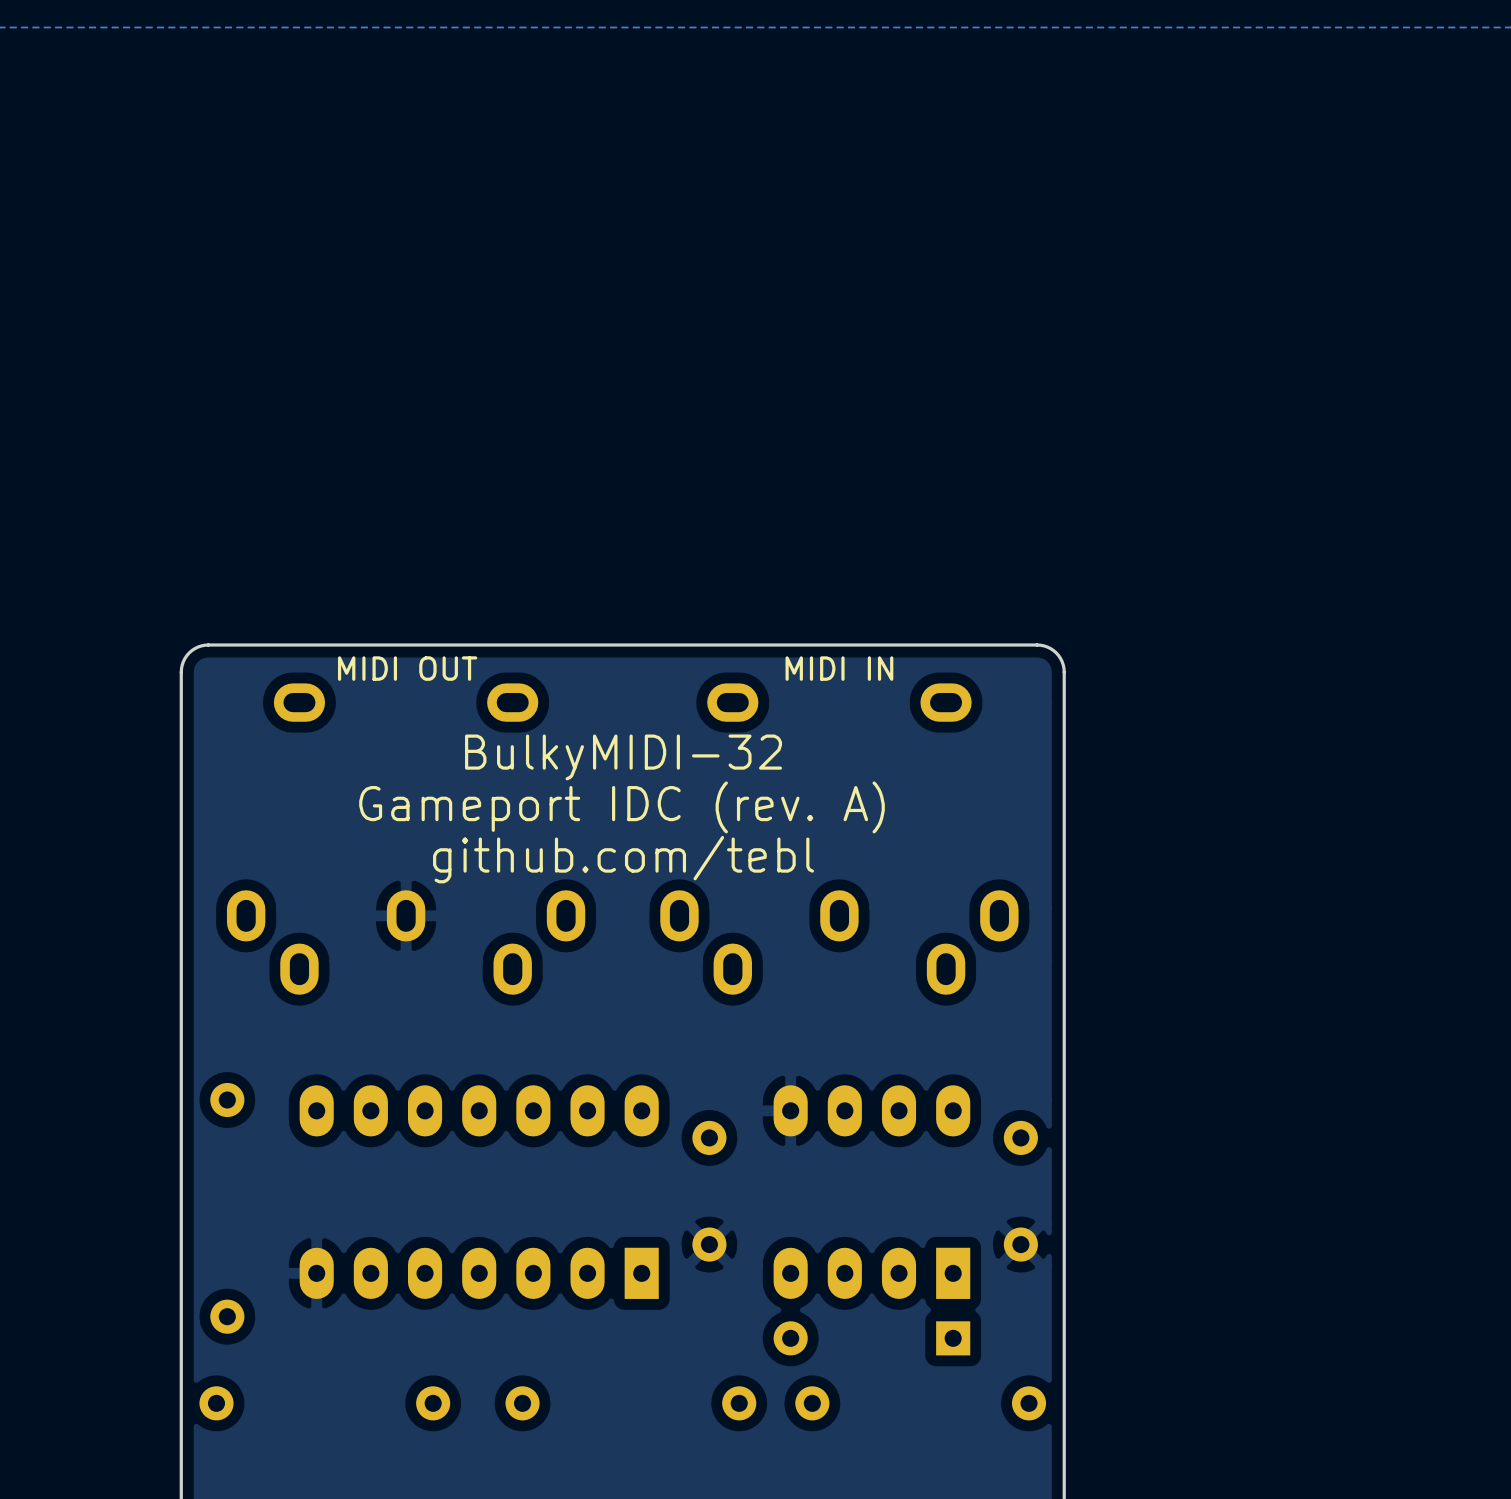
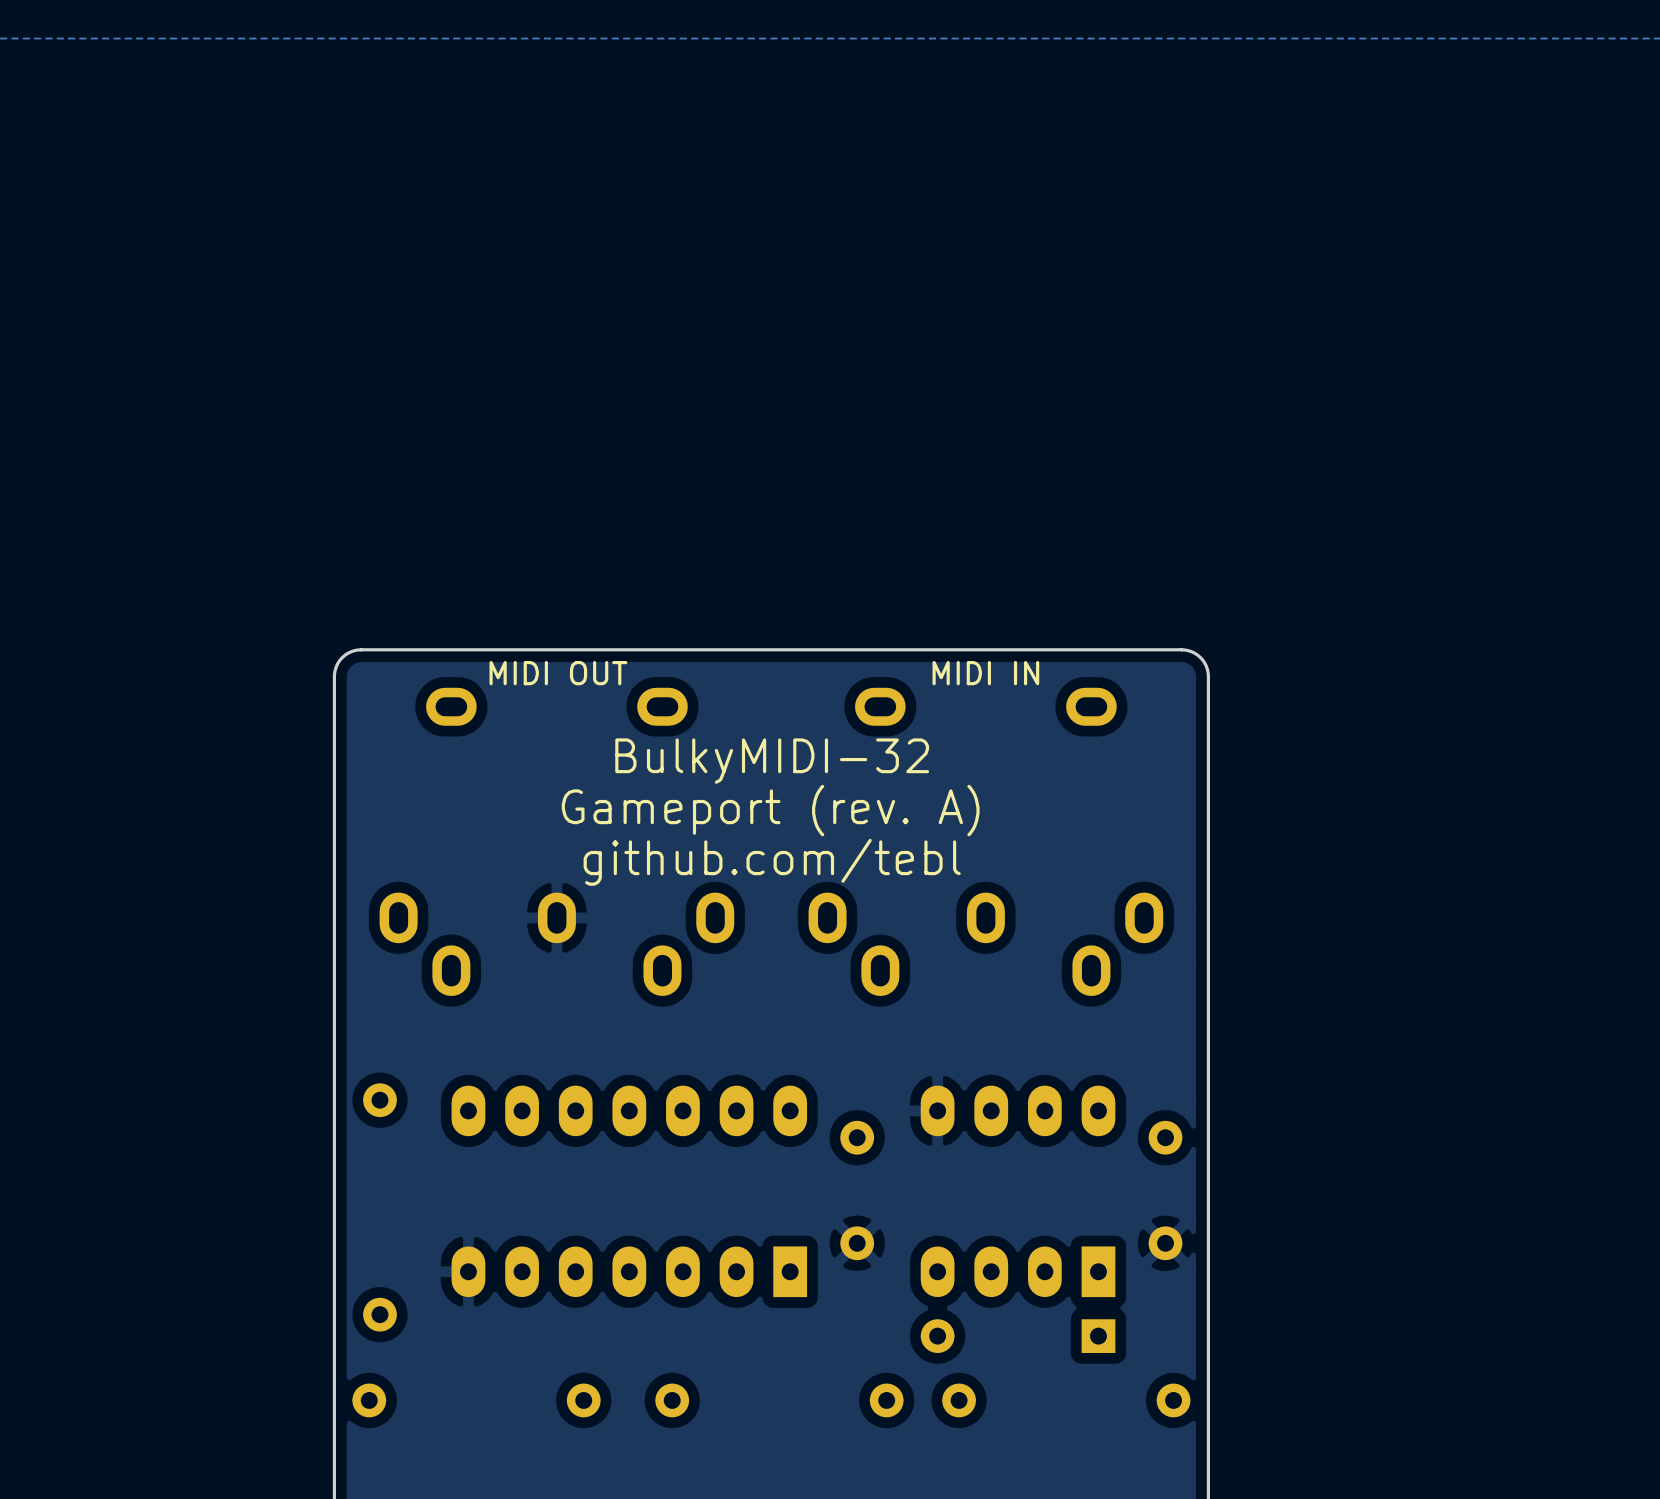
text: Gameport IDC (rev. A) (621, 807) -> Gameport (rev. A) (770, 810)

